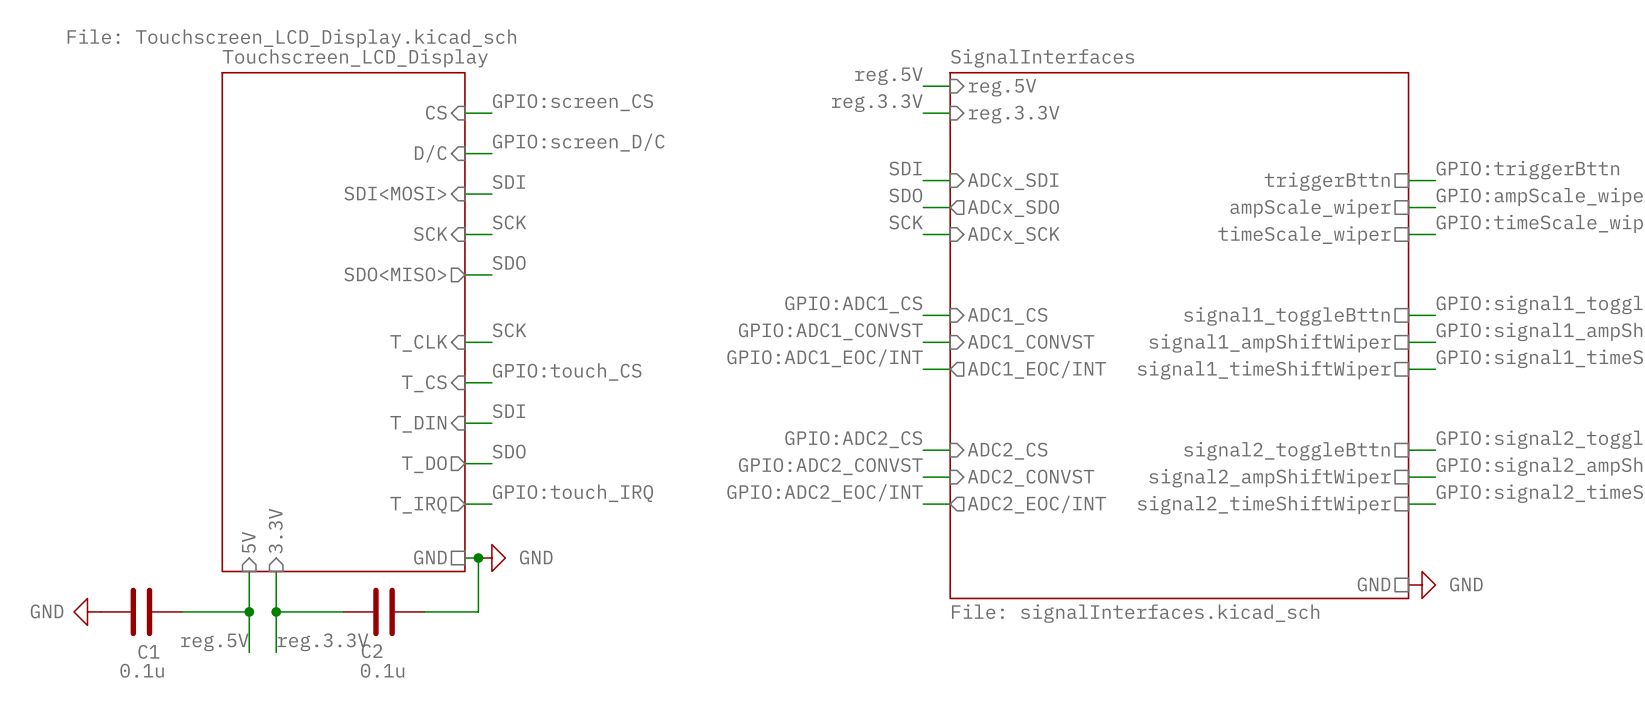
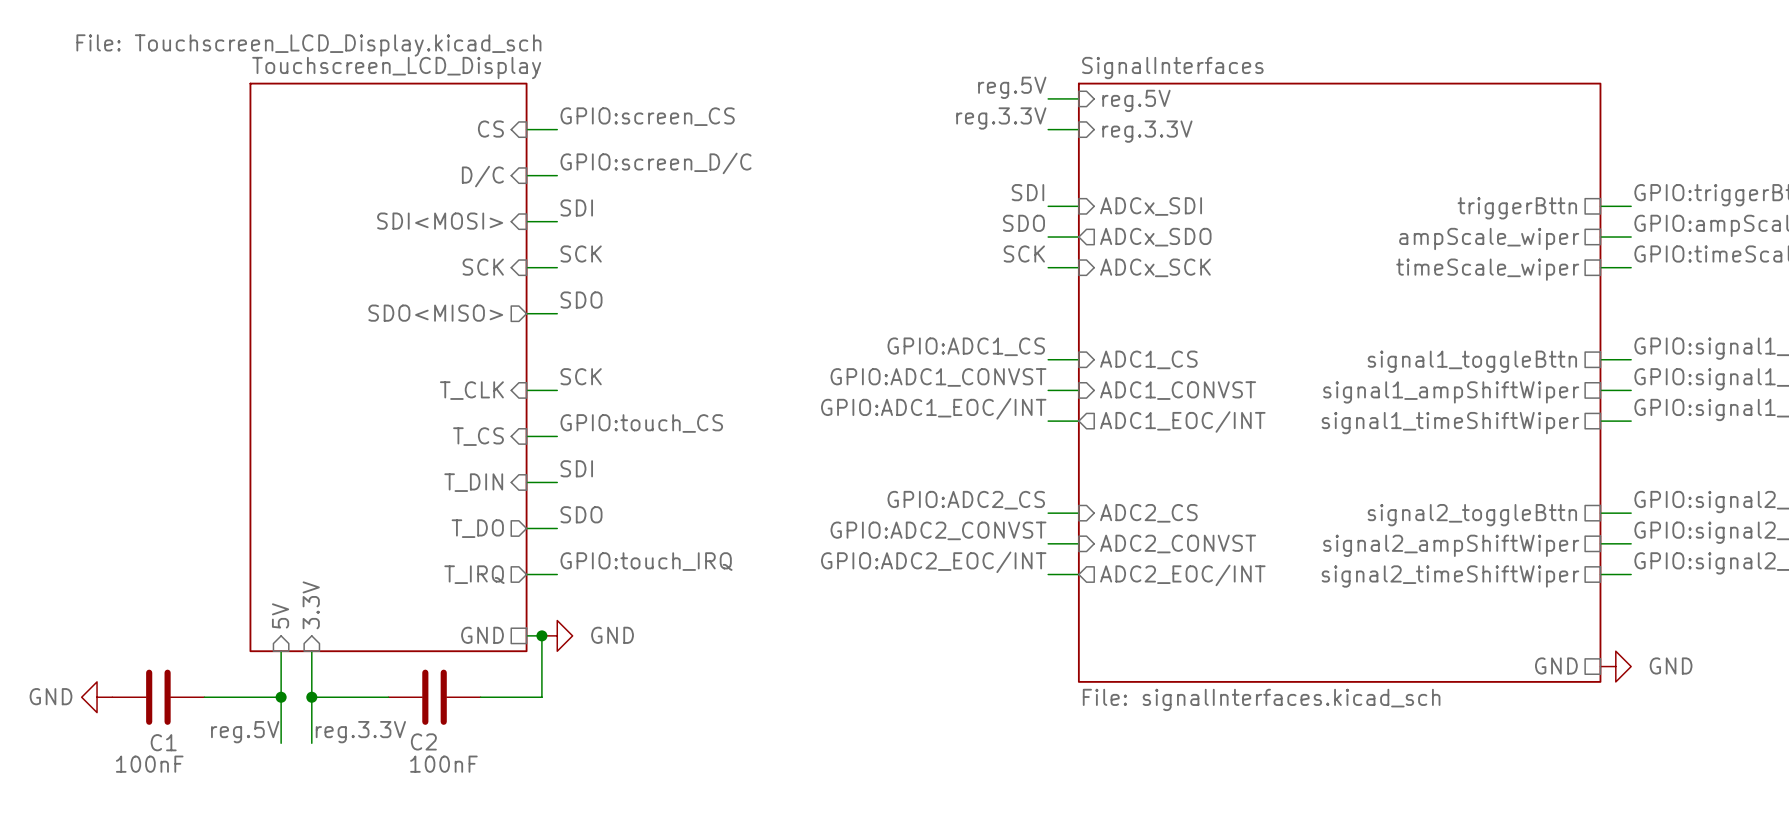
C1 value: 0.1u (142, 670) -> 100nF (149, 764)
C2 value: 0.1u (382, 670) -> 100nF (443, 764)

